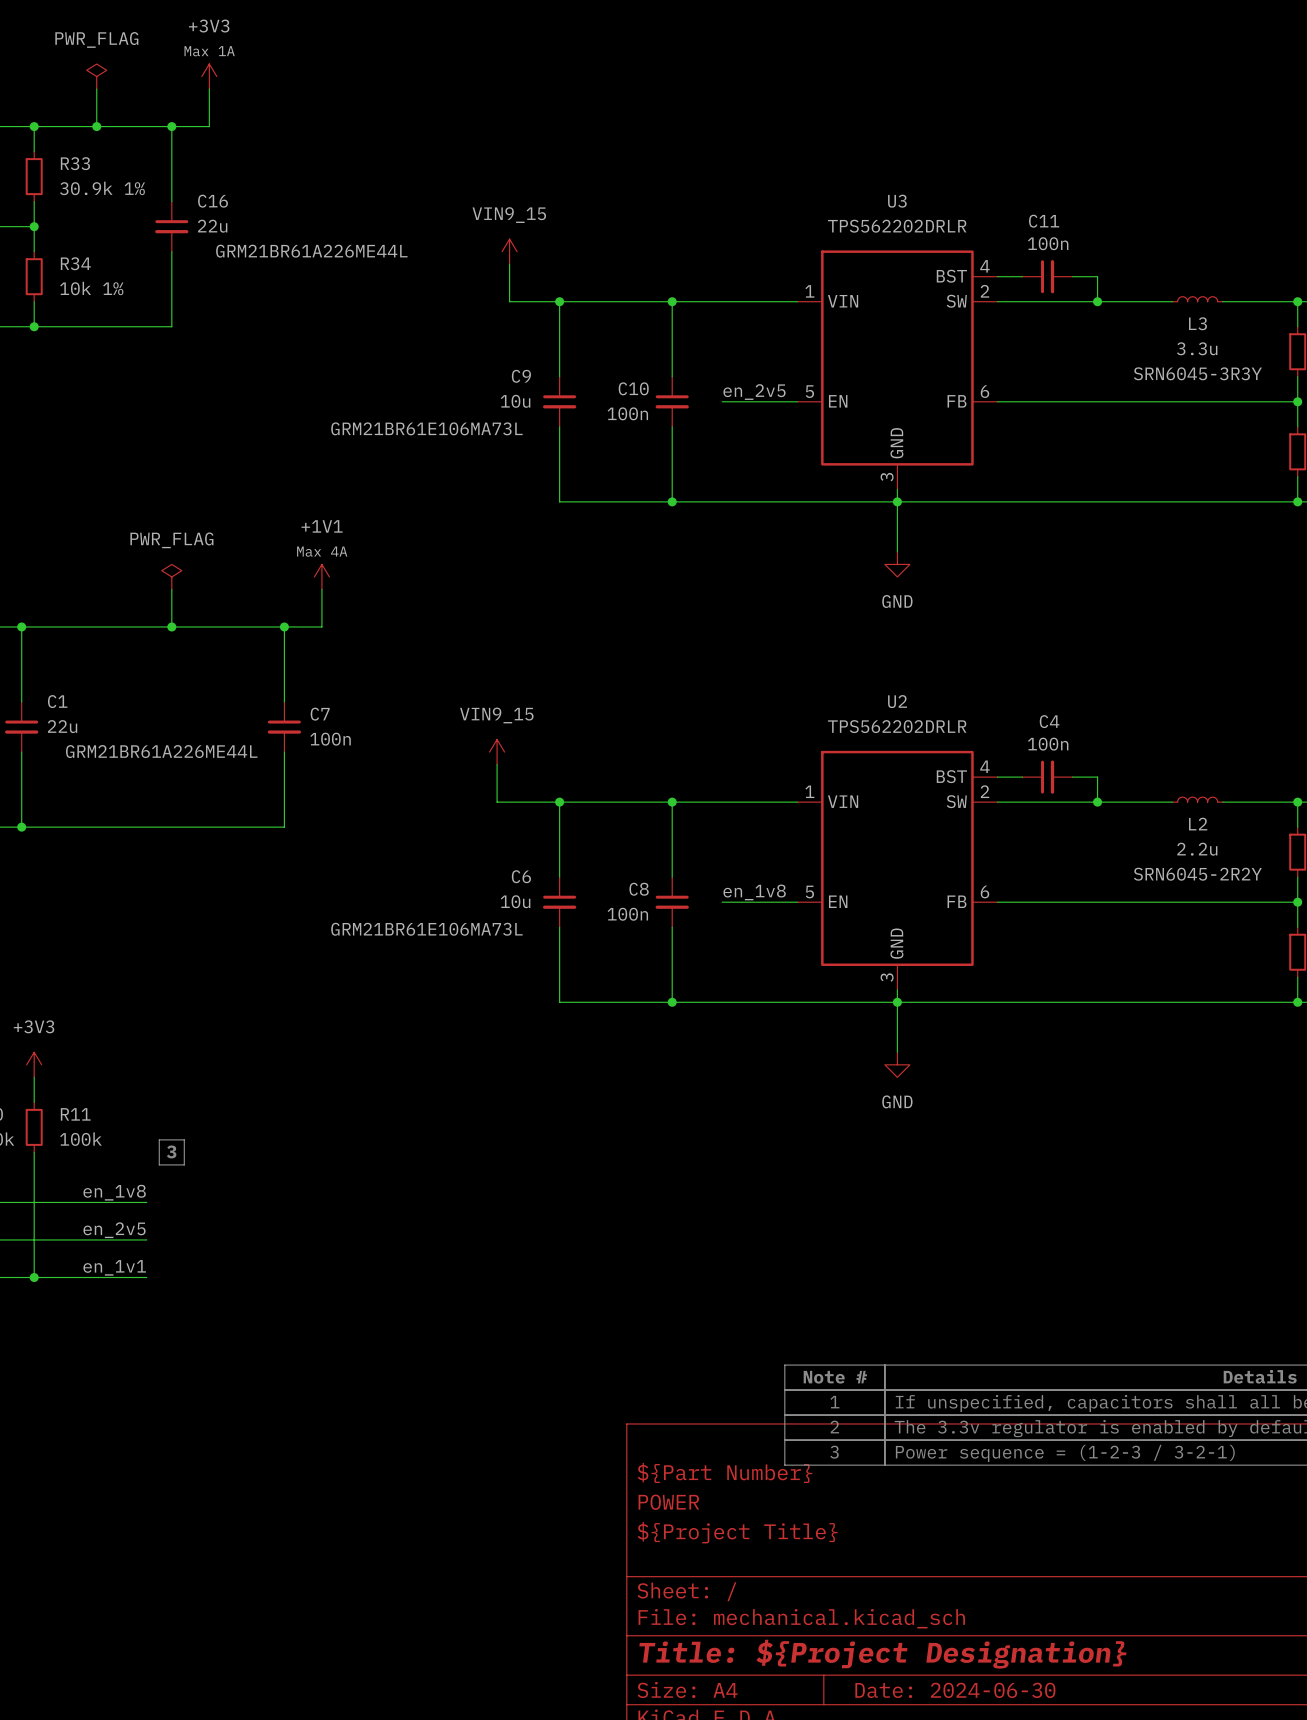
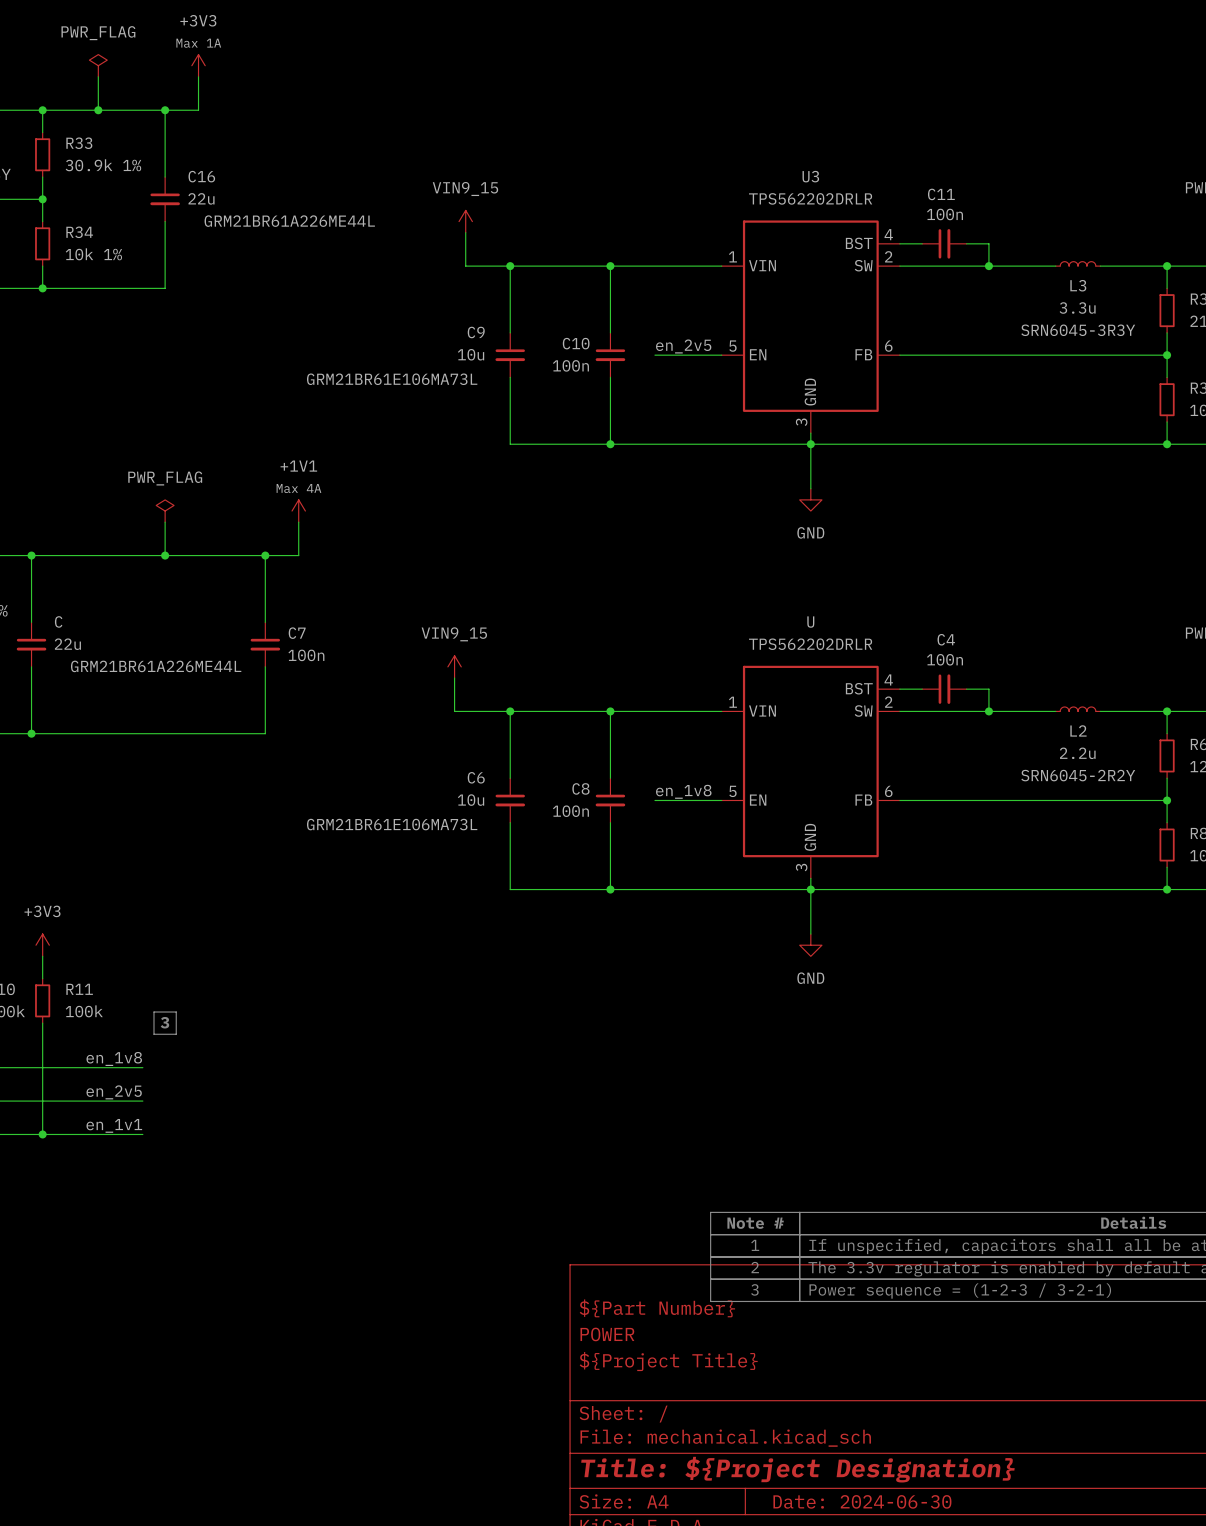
C1 name: C1 (57, 701) -> C (58, 621)
U2 name: U2 (897, 701) -> U (810, 622)

